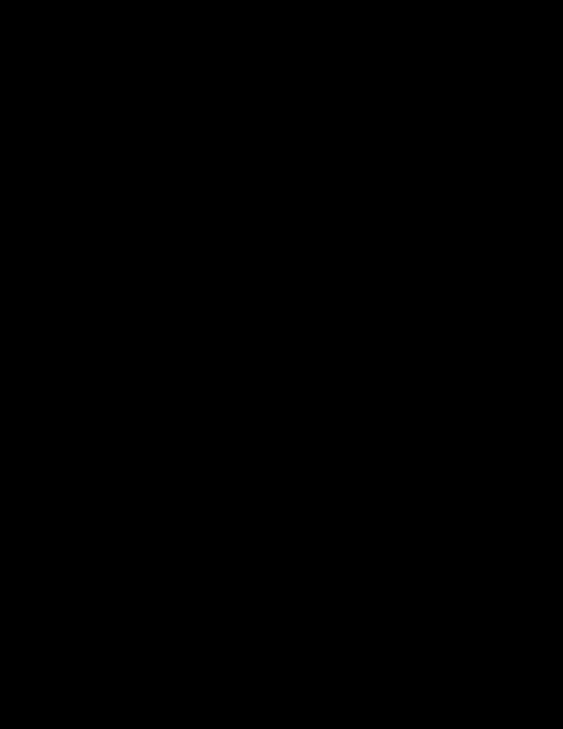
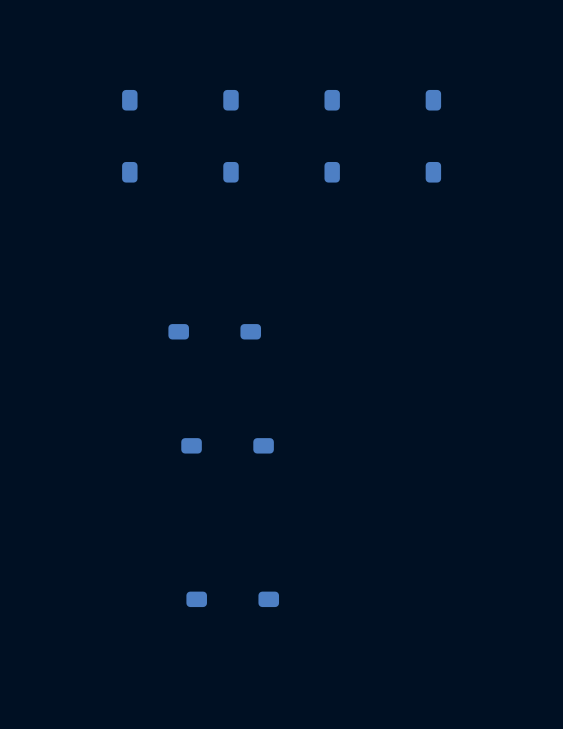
part: none -> (129, 136)
part: none -> (231, 136)
part: none -> (332, 136)
part: none -> (433, 136)
part: none -> (214, 331)
part: none -> (227, 445)
part: none -> (232, 599)

